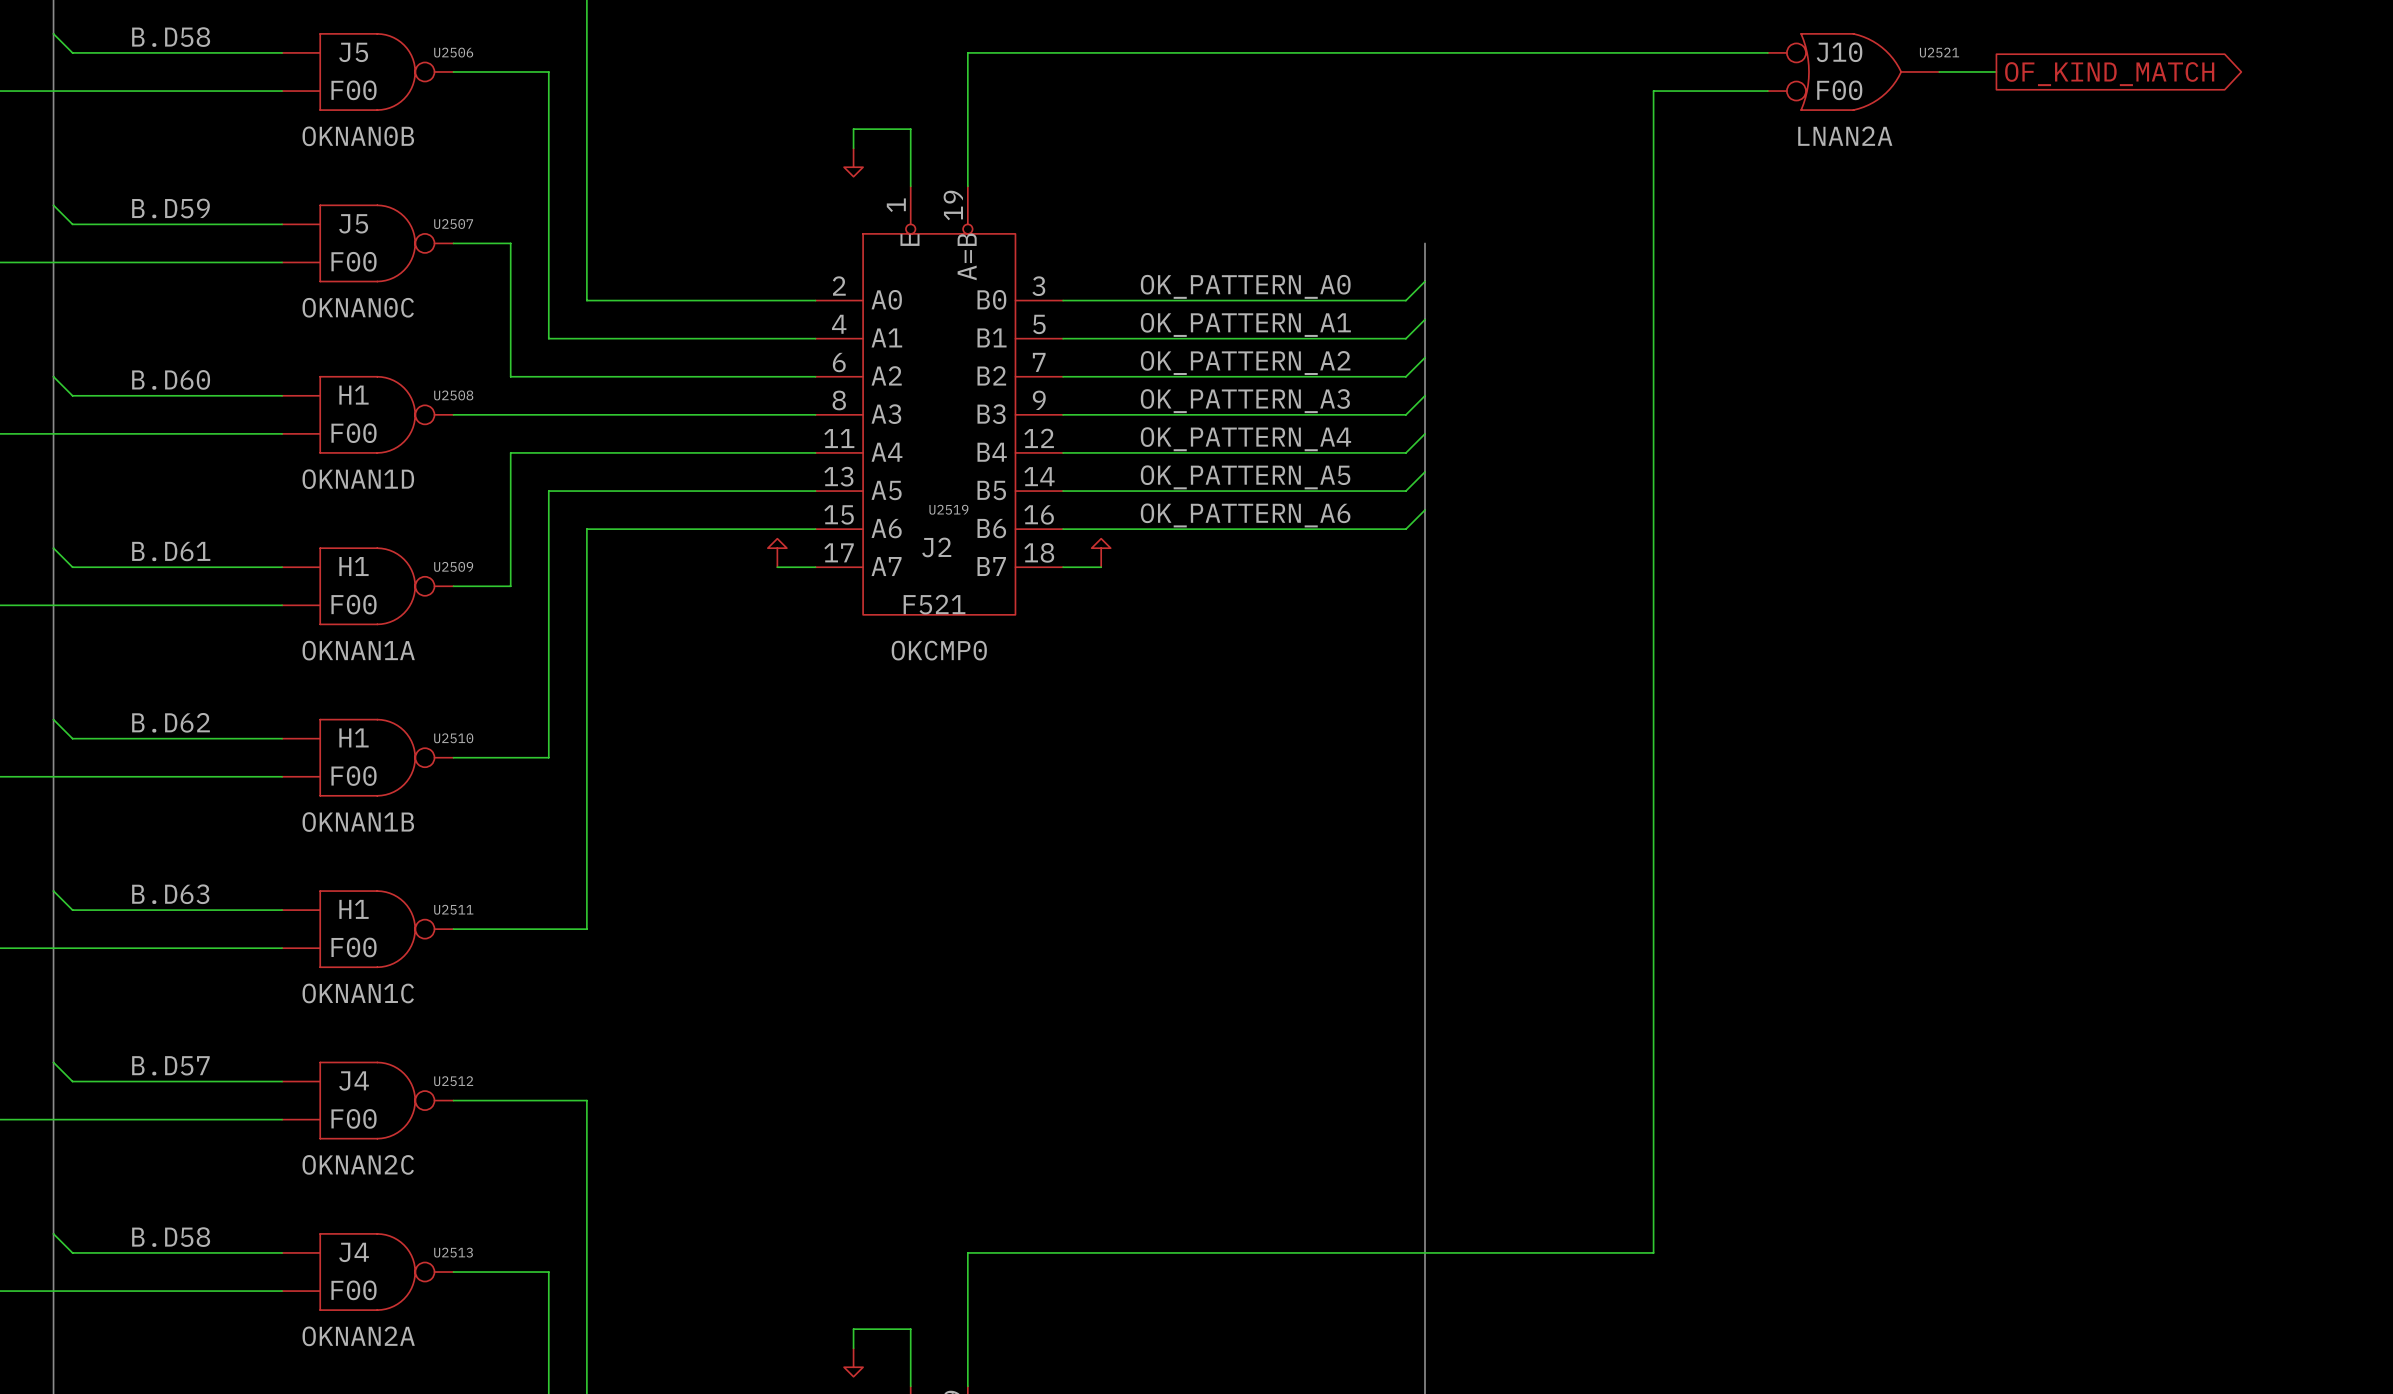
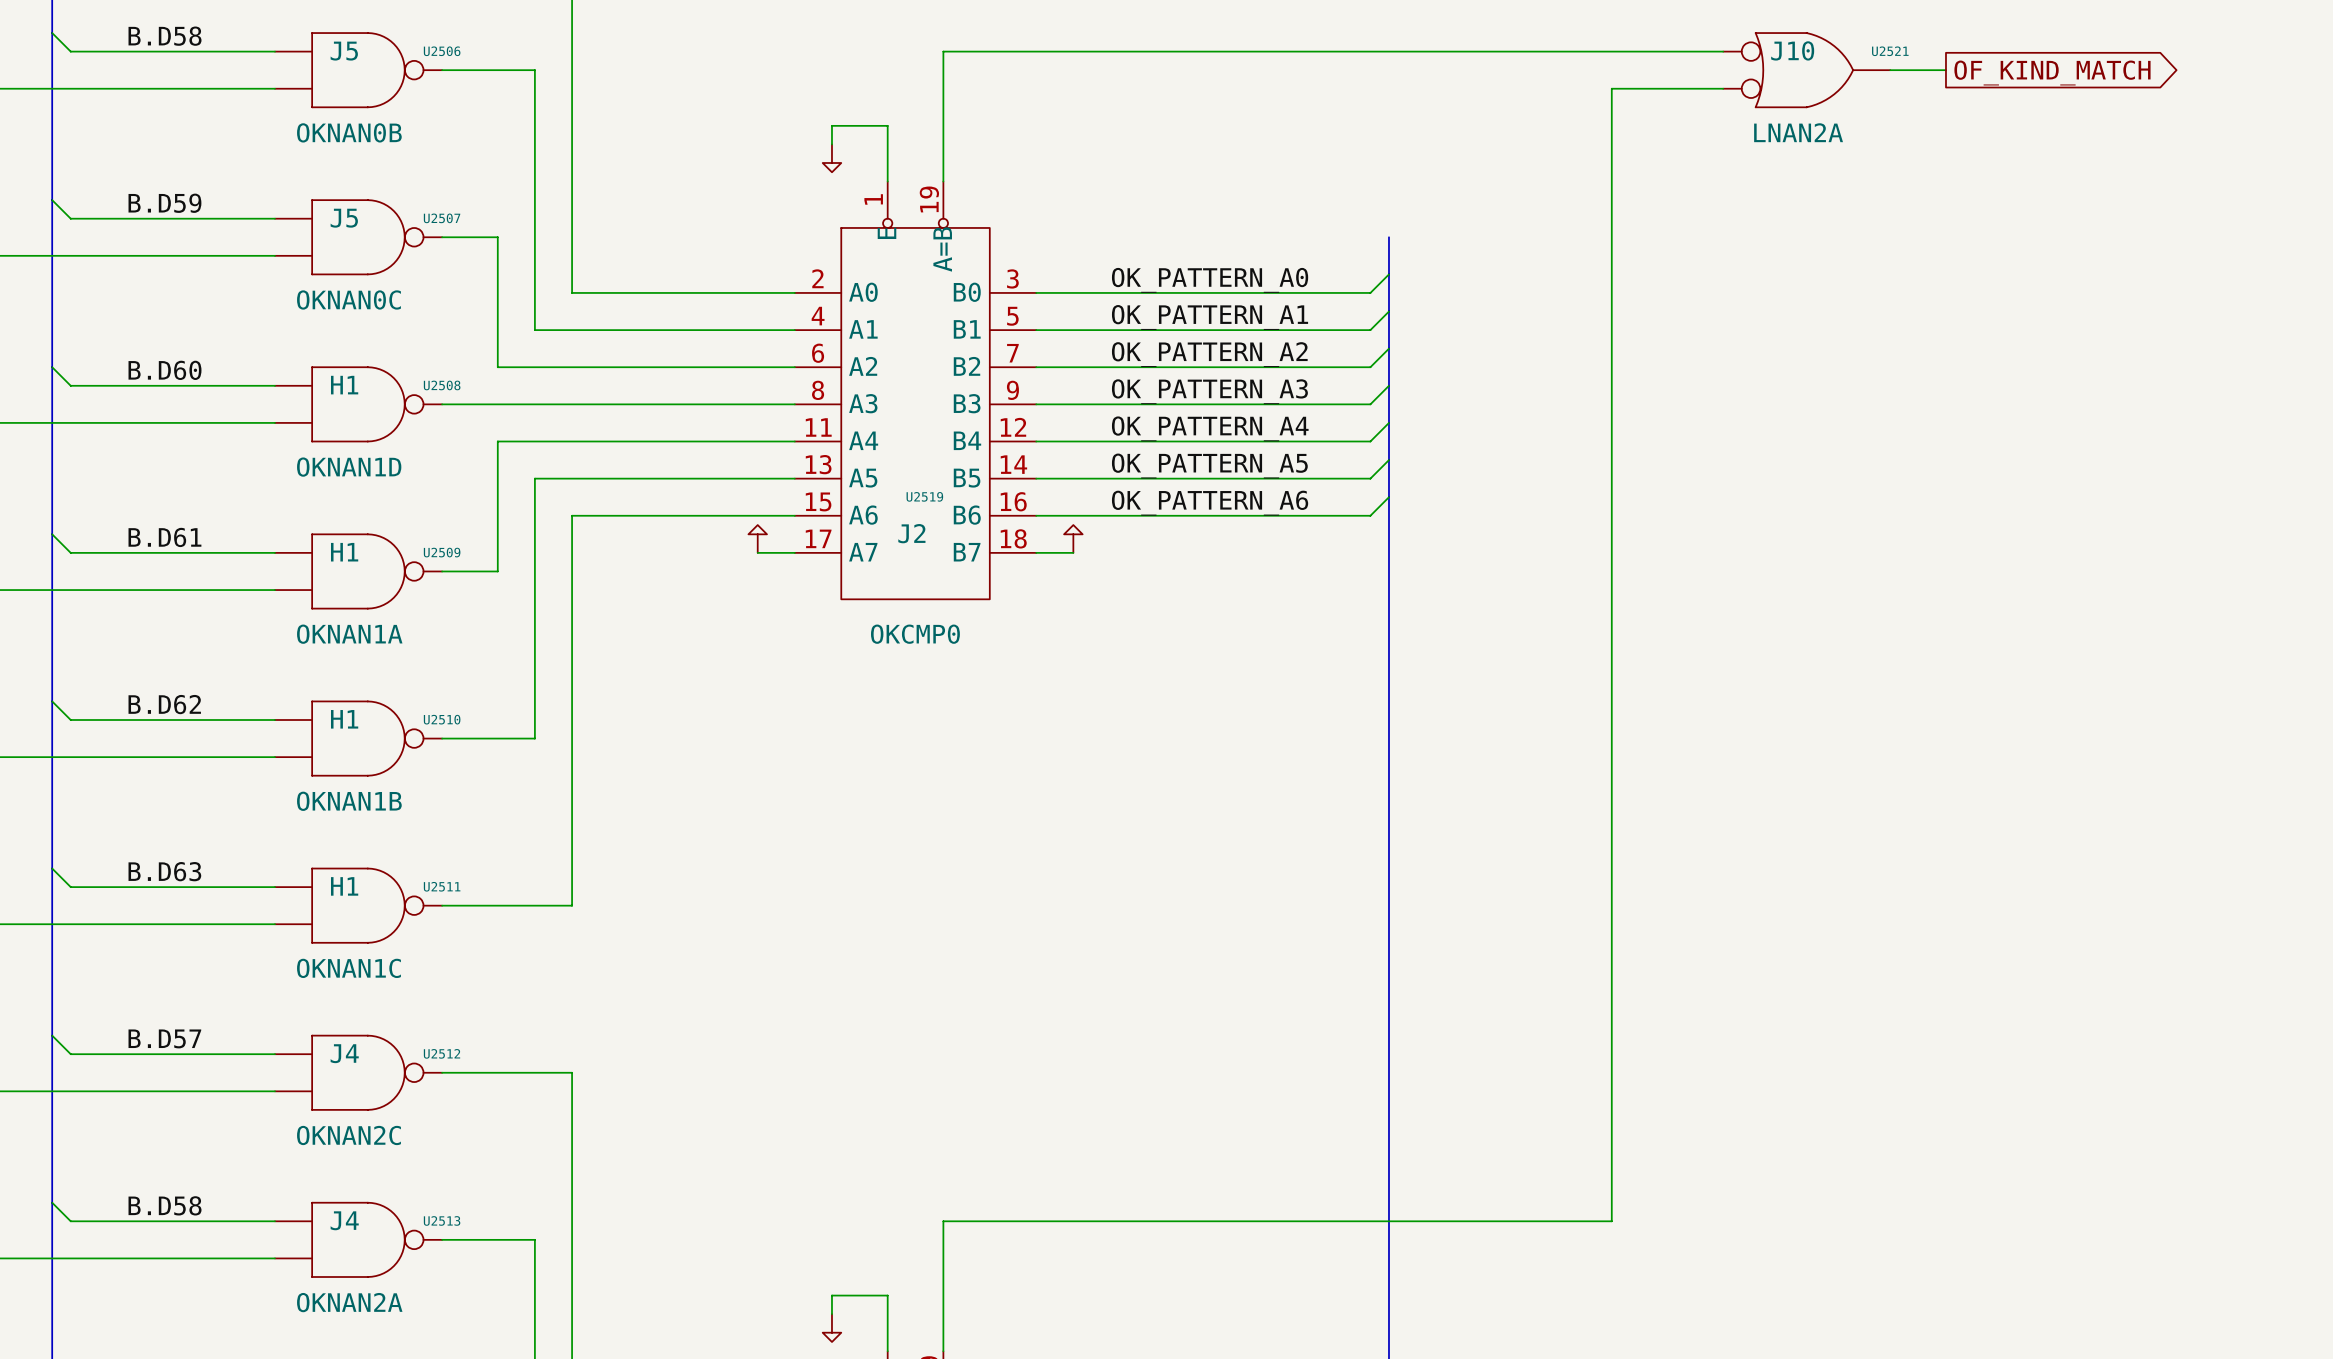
U2506 value: F00 (354, 90) -> none
U2521 value: F00 (1839, 90) -> none
U2507 value: F00 (354, 261) -> none
U2508 value: F00 (354, 433) -> none
U2509 value: F00 (354, 604) -> none
U2519 value: F521 (934, 604) -> none
U2510 value: F00 (354, 776) -> none
U2511 value: F00 (354, 947) -> none
U2512 value: F00 (354, 1118) -> none
U2513 value: F00 (354, 1290) -> none

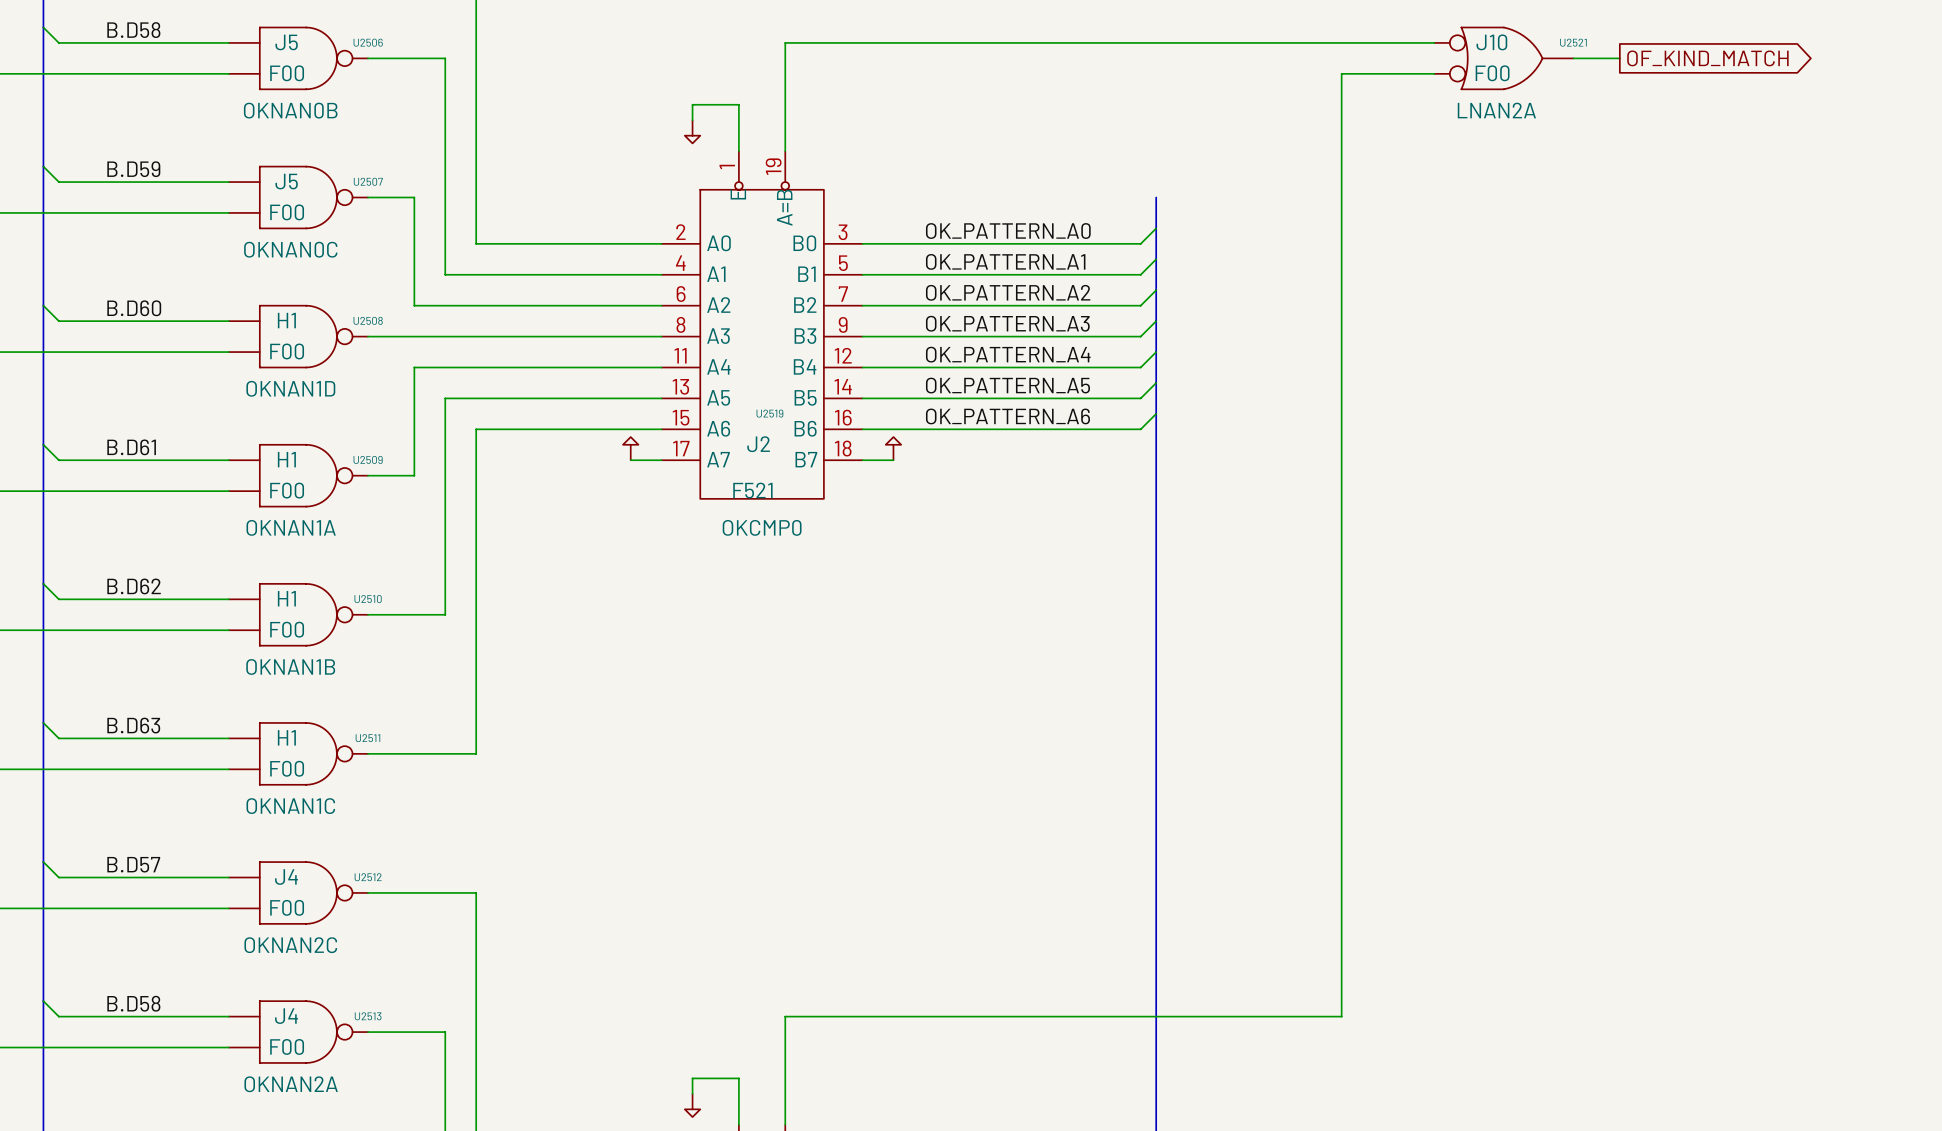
U2506 value: none -> F00 (287, 73)
U2521 value: none -> F00 (1492, 73)
U2507 value: none -> F00 (287, 212)
U2508 value: none -> F00 (287, 351)
U2509 value: none -> F00 (287, 490)
U2519 value: none -> F521 (752, 490)
U2510 value: none -> F00 (287, 629)
U2511 value: none -> F00 (287, 768)
U2512 value: none -> F00 (287, 907)
U2513 value: none -> F00 (287, 1046)

